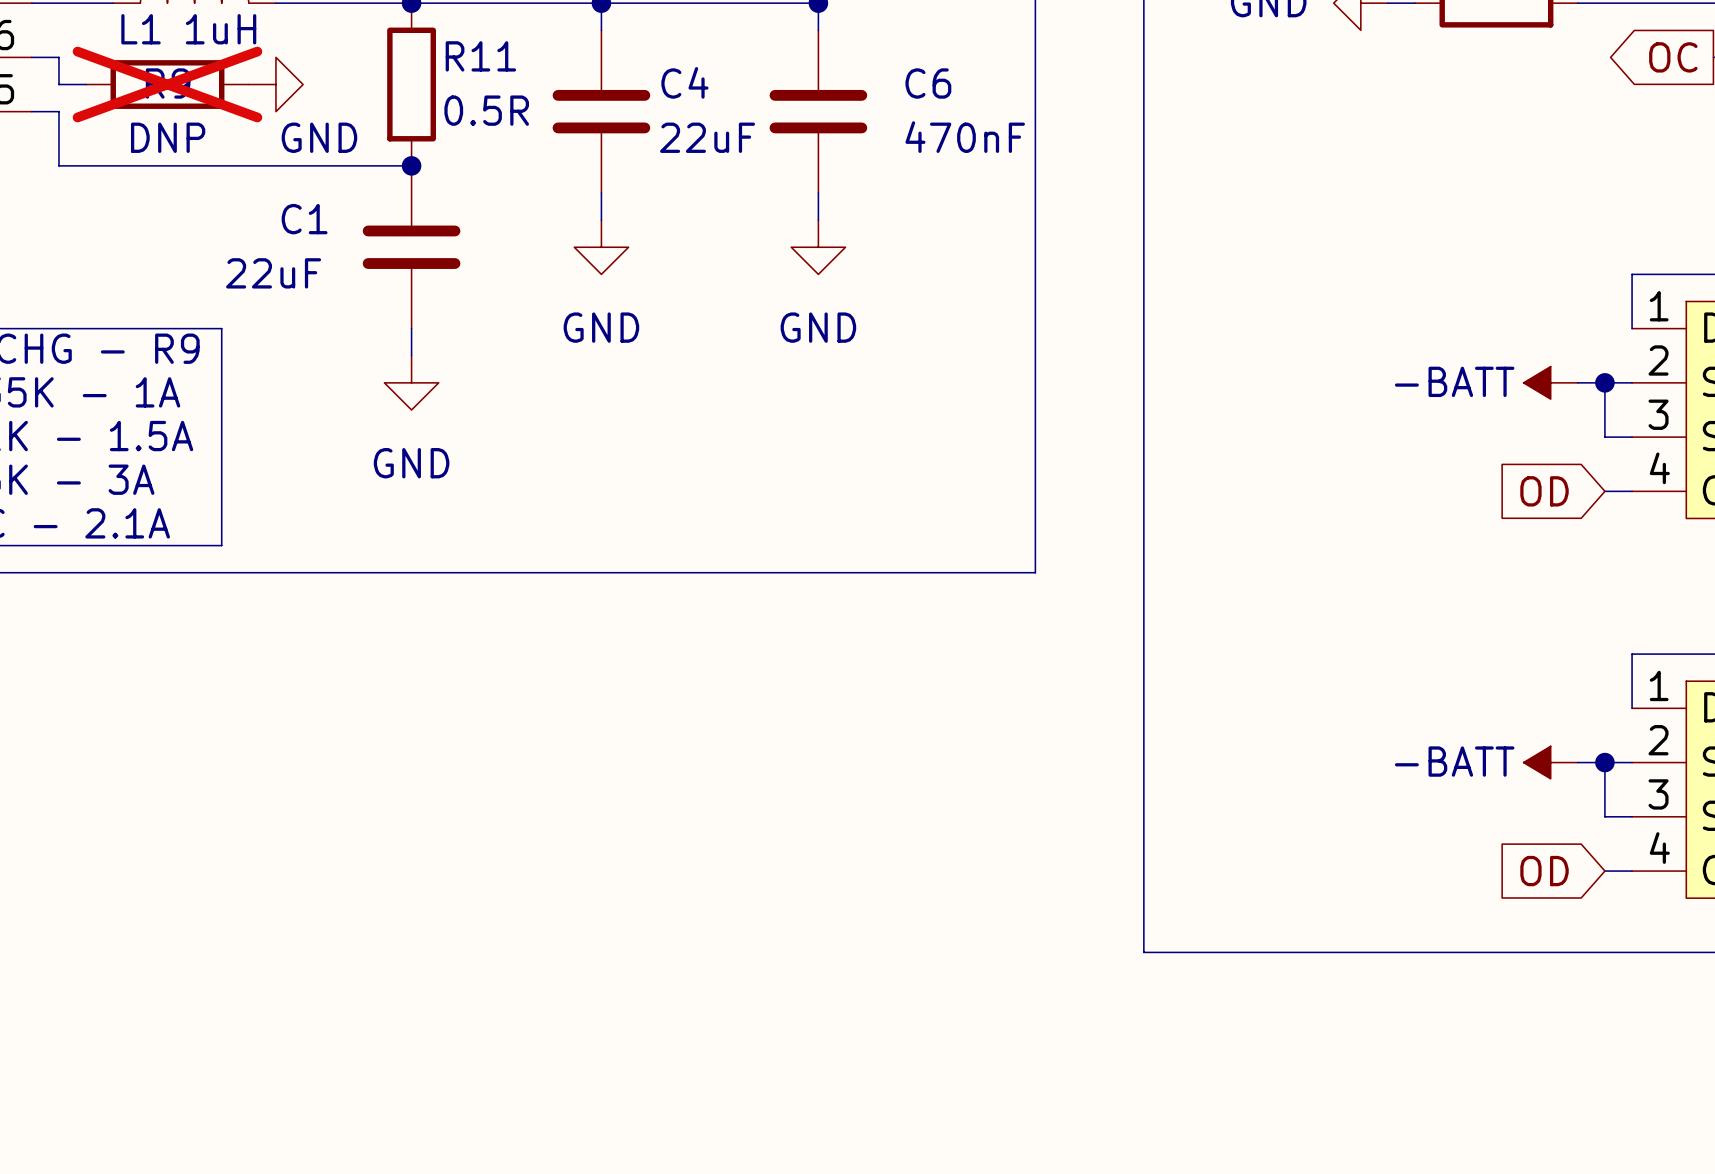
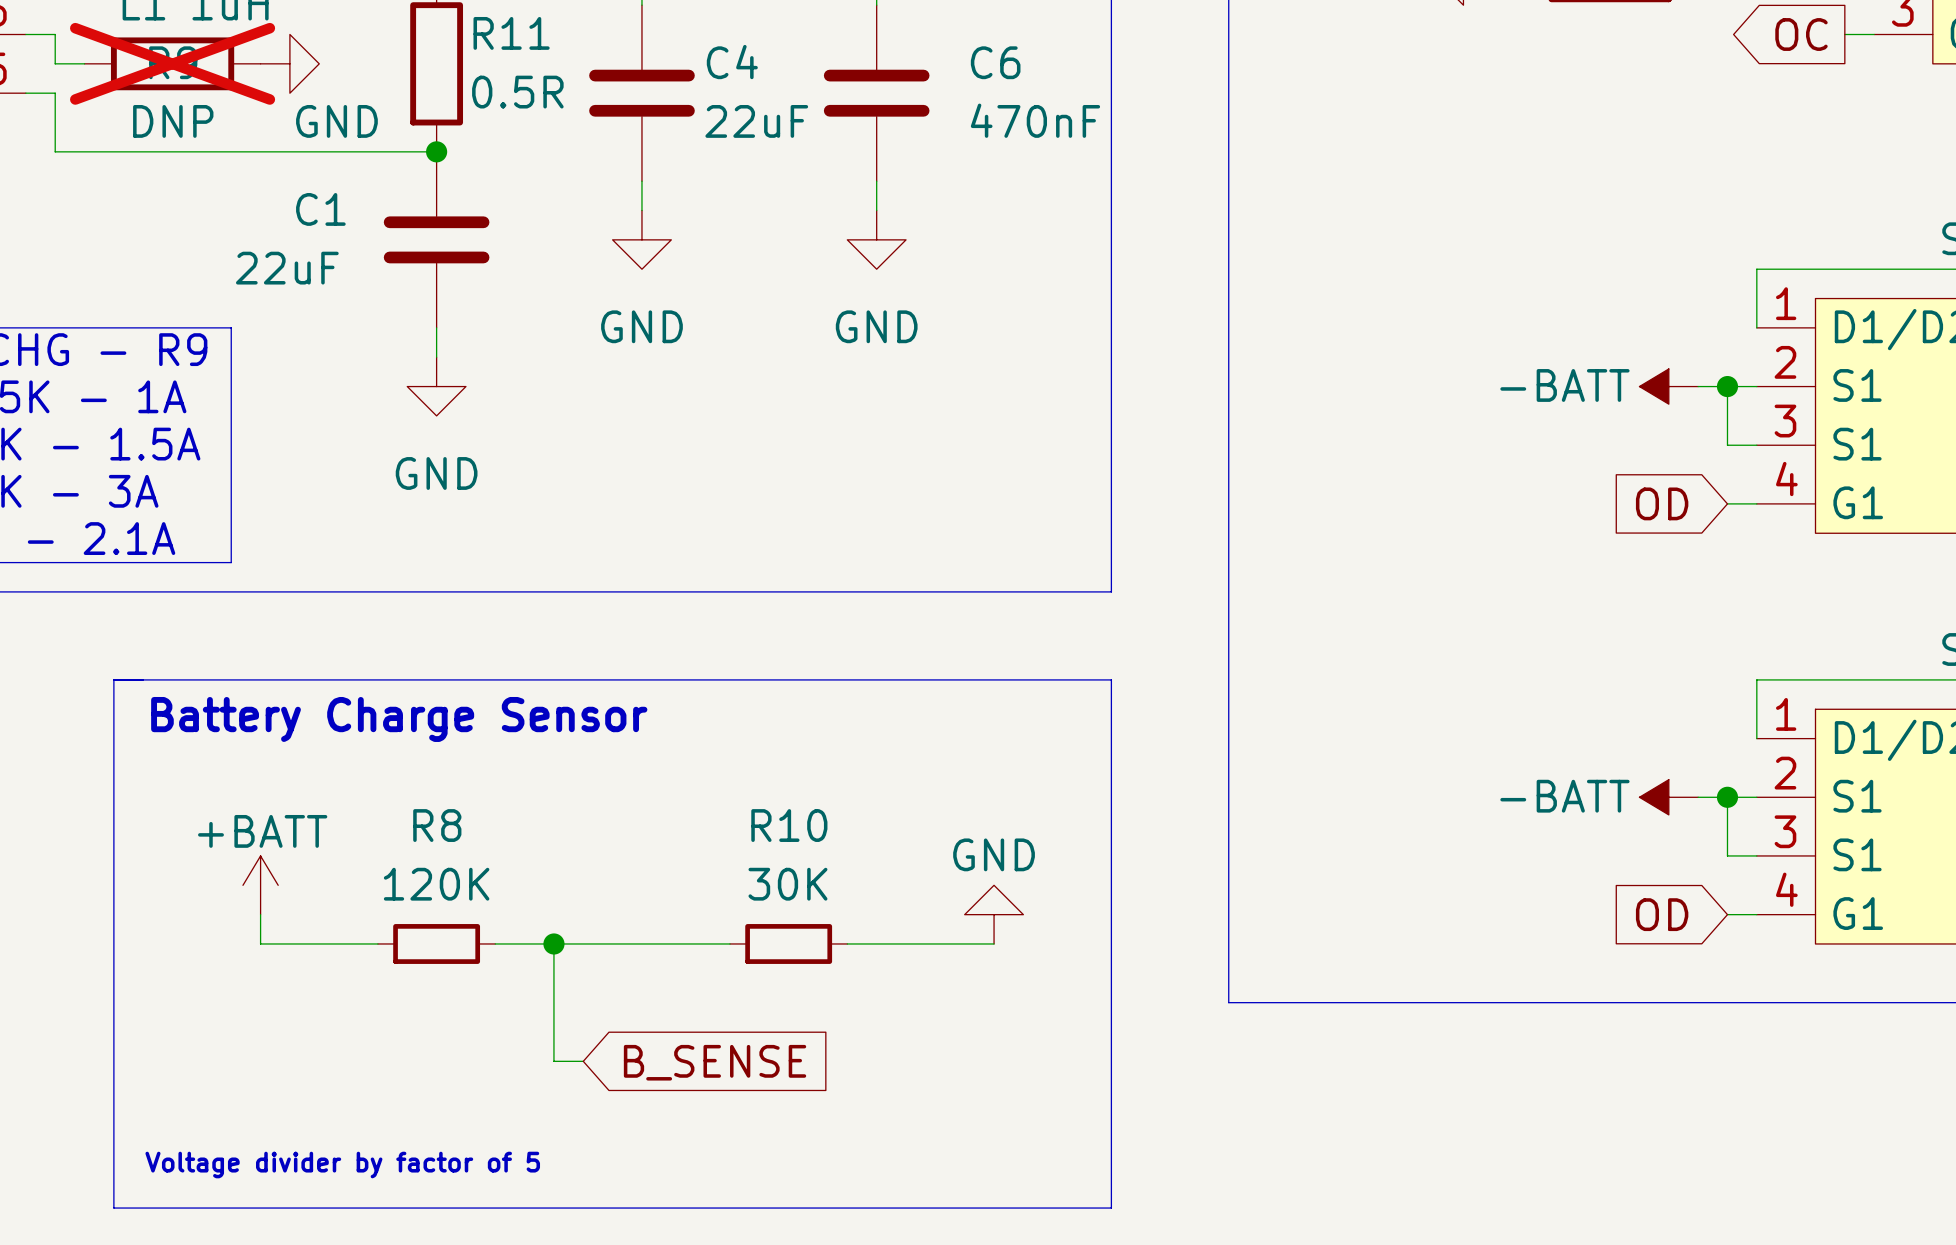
line: none -> (113, 679) (113, 1208) (1111, 1208) (1111, 679) (113, 679)
text: none -> Battery Charge Sensor (399, 719)
power symbol: none -> +BATT (260, 885)
wire: none -> (260, 914) (260, 943) (377, 943)
power symbol: none -> GND (994, 914)
R8: none -> 120K (436, 943)
wire: none -> (495, 943) (729, 943)
wire: none -> (553, 943) (553, 1061) (583, 1061)
junction: none -> (553, 943)
R10: none -> 30K (788, 943)
wire: none -> (847, 943) (994, 943)
global label: none -> B_SENSE (715, 1062)
text: none -> Voltage divider by factor of 5 (342, 1165)

